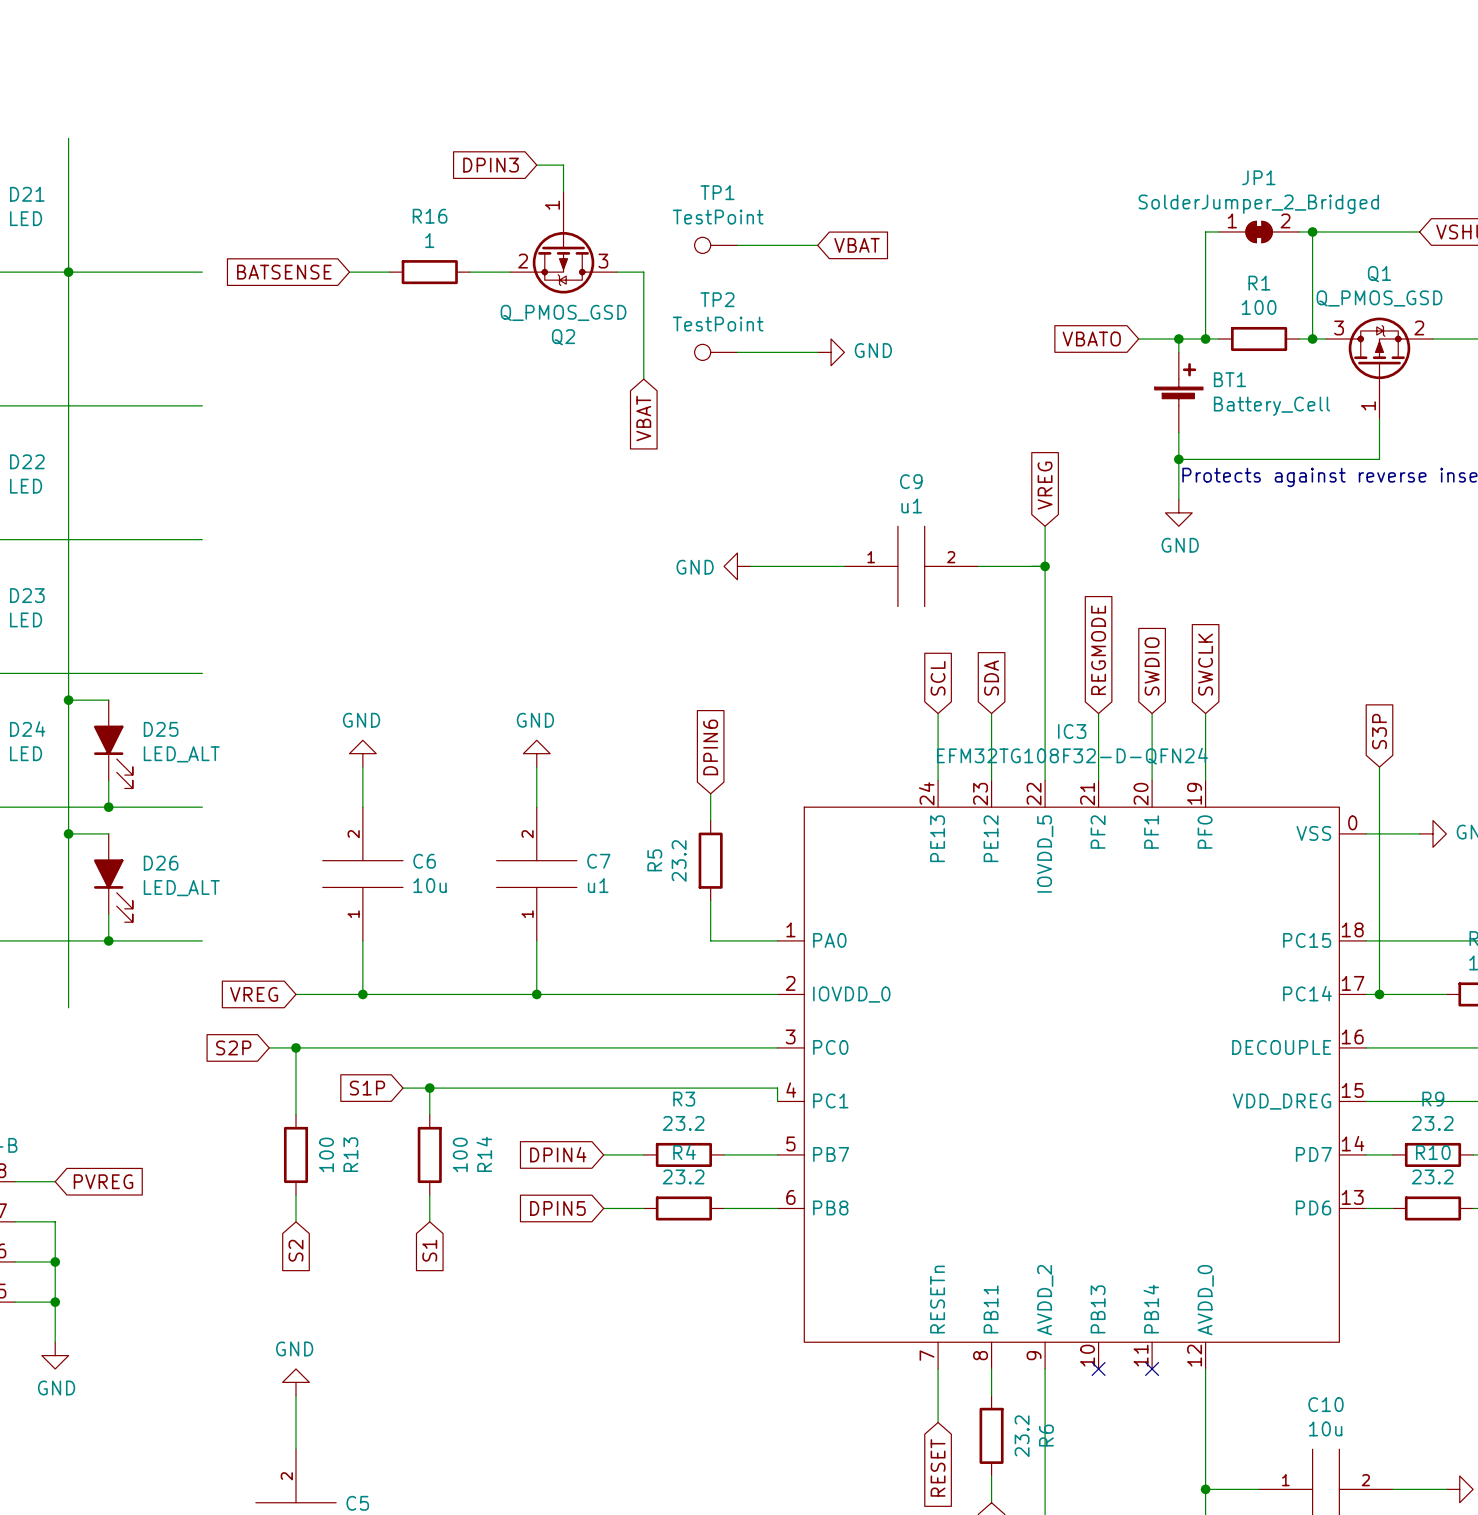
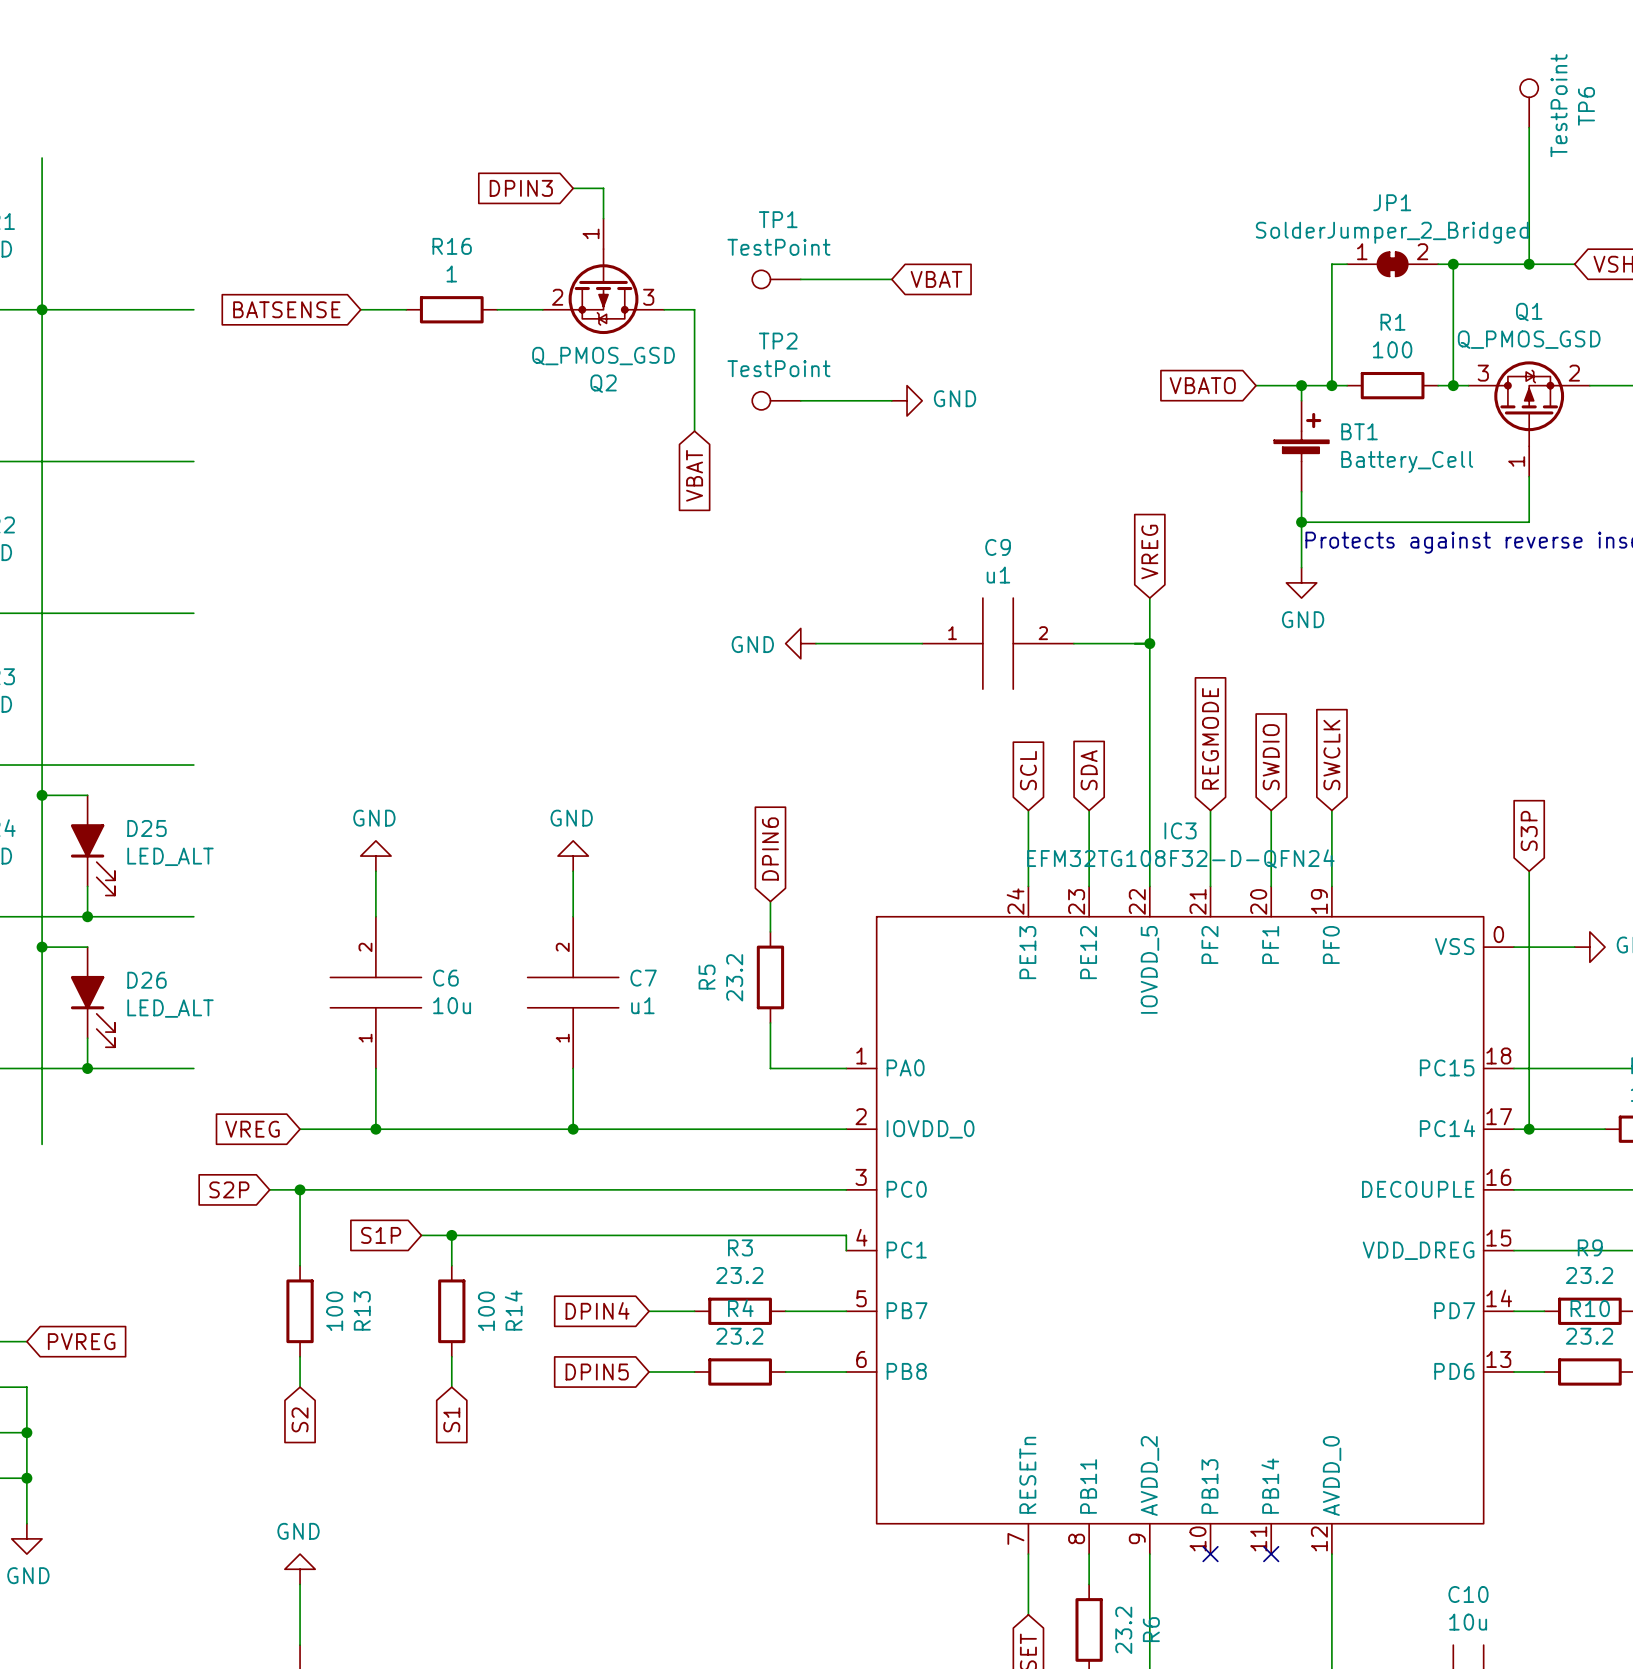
TP6: none -> TestPoint (1529, 103)
wire: none -> (1529, 127) (1529, 264)
junction: none -> (1529, 264)

